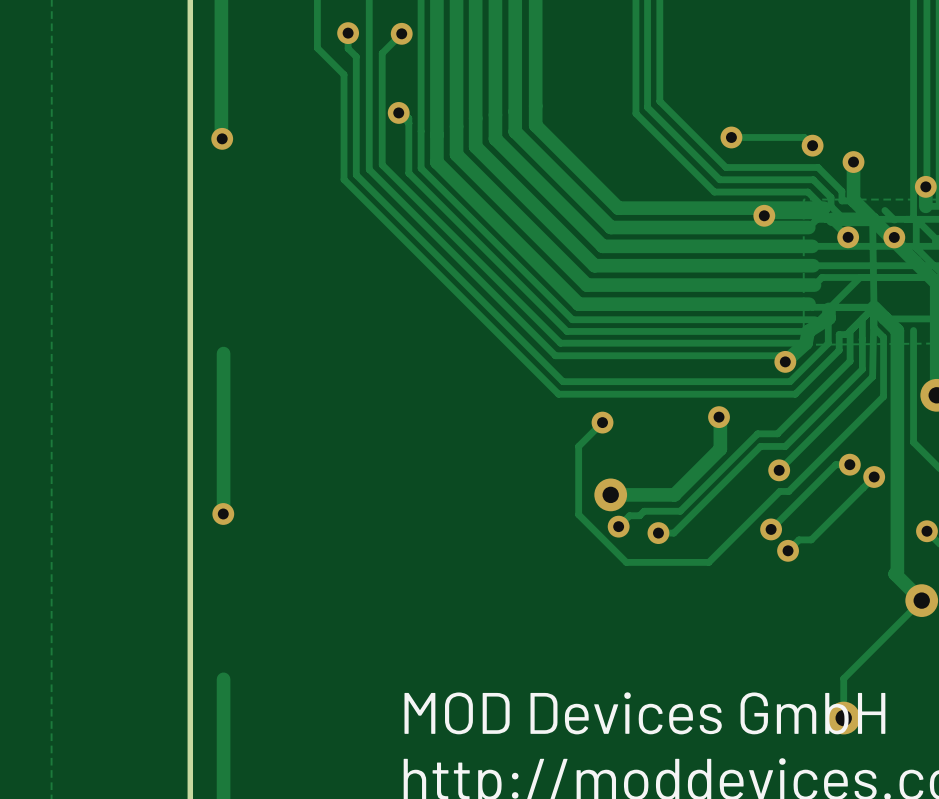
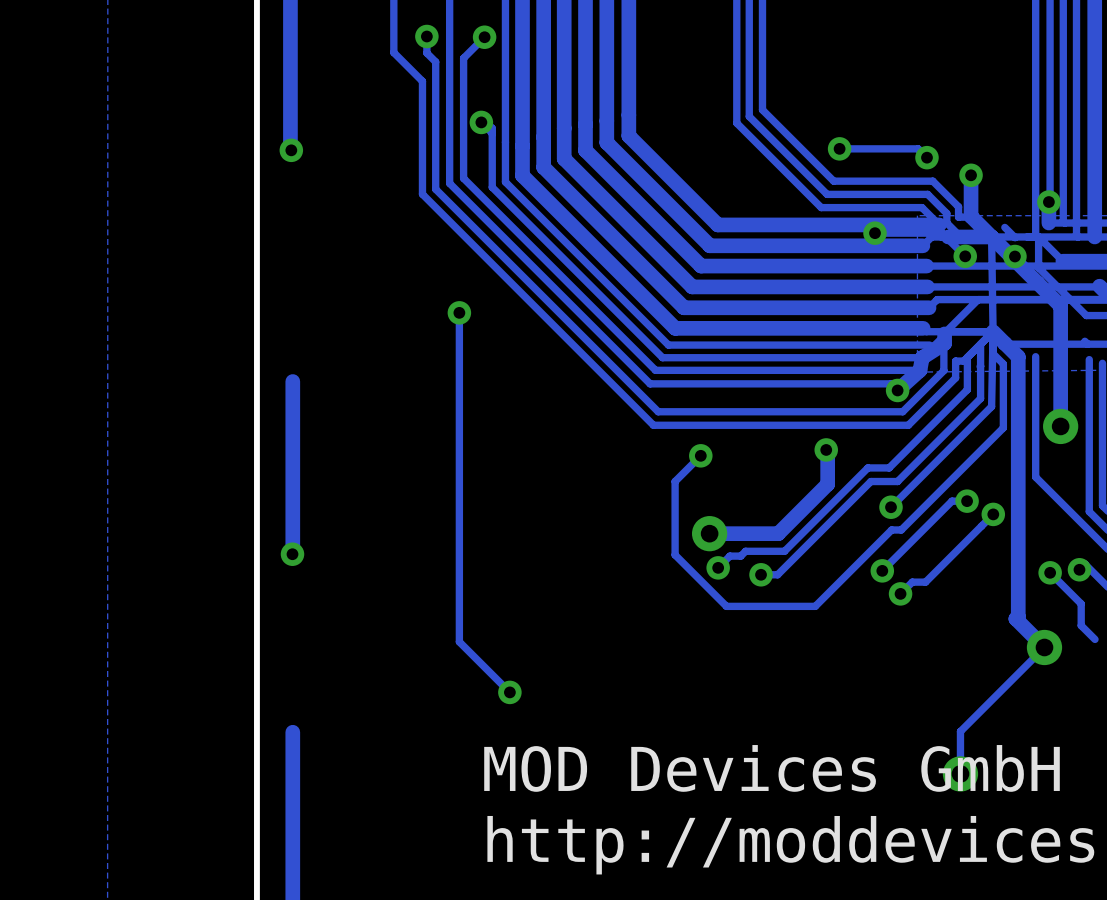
track: none -> (459, 312) (459, 641) (509, 692)
via: none -> (459, 312)
via: none -> (509, 692)

